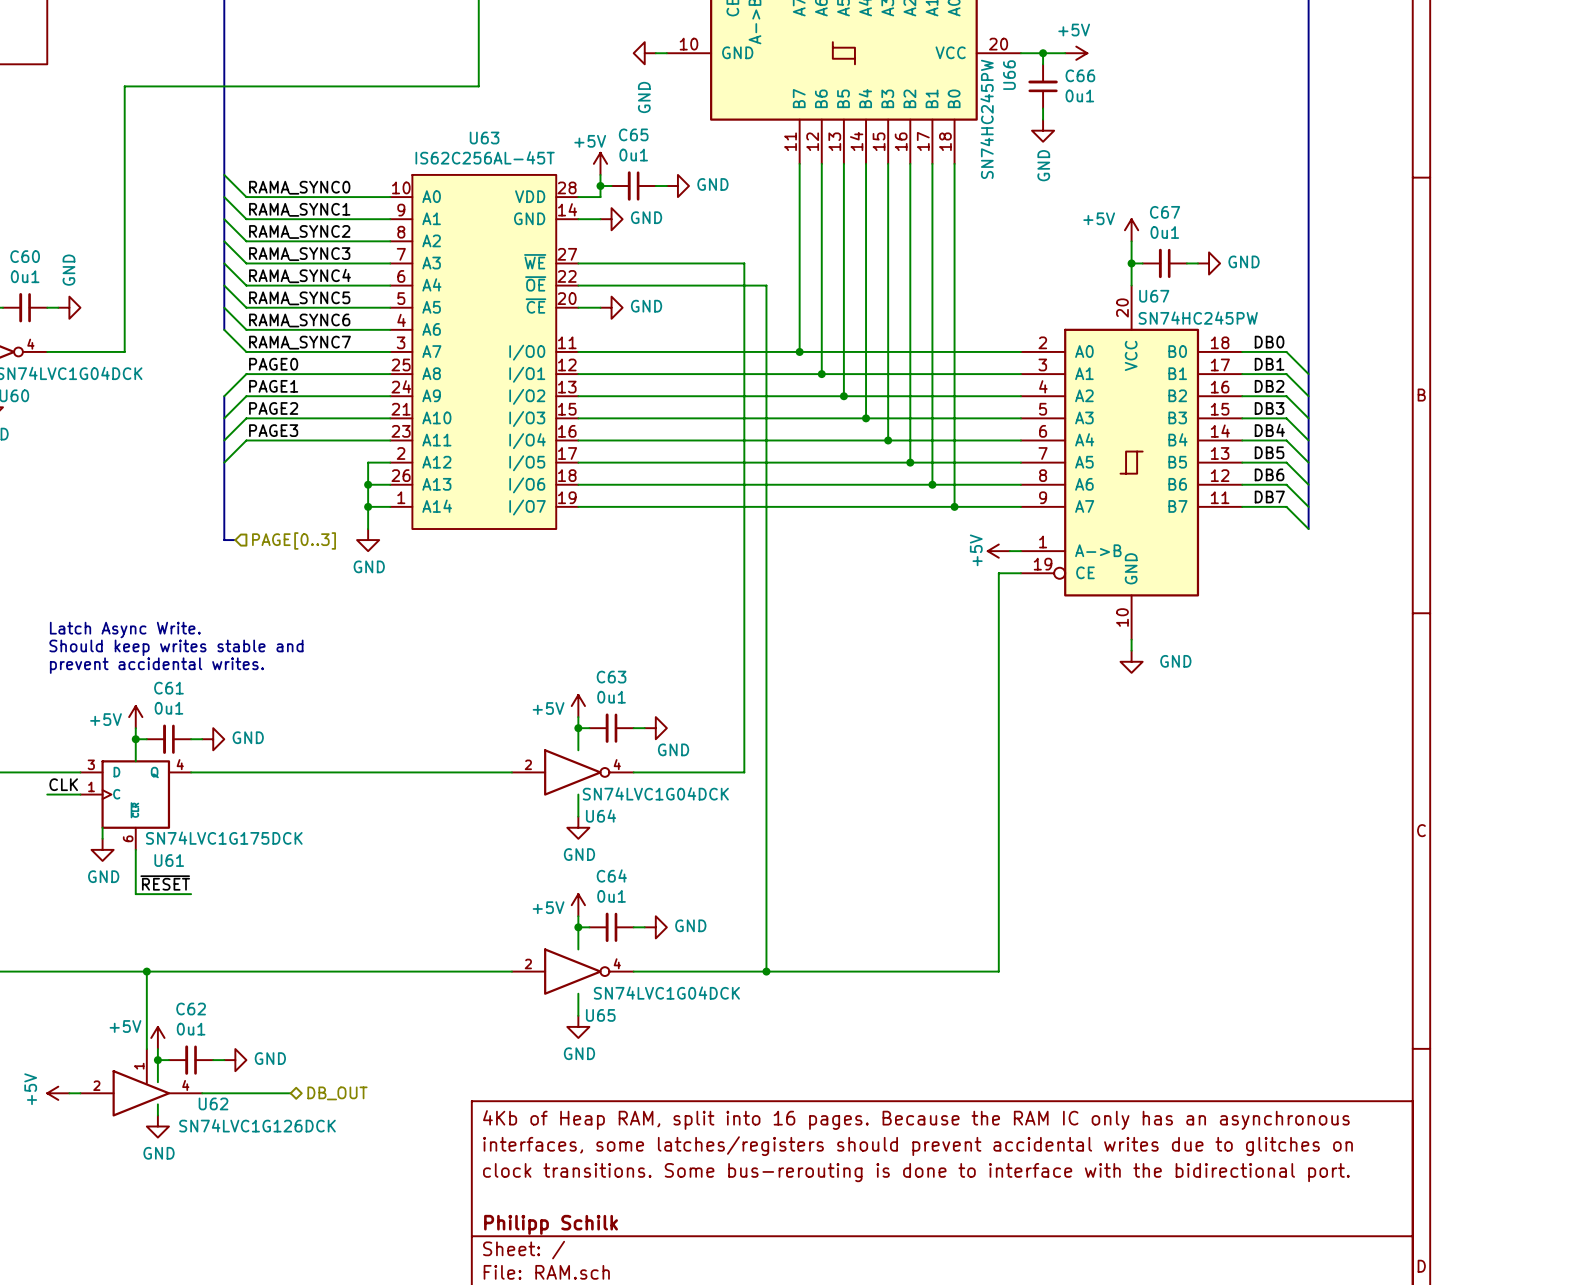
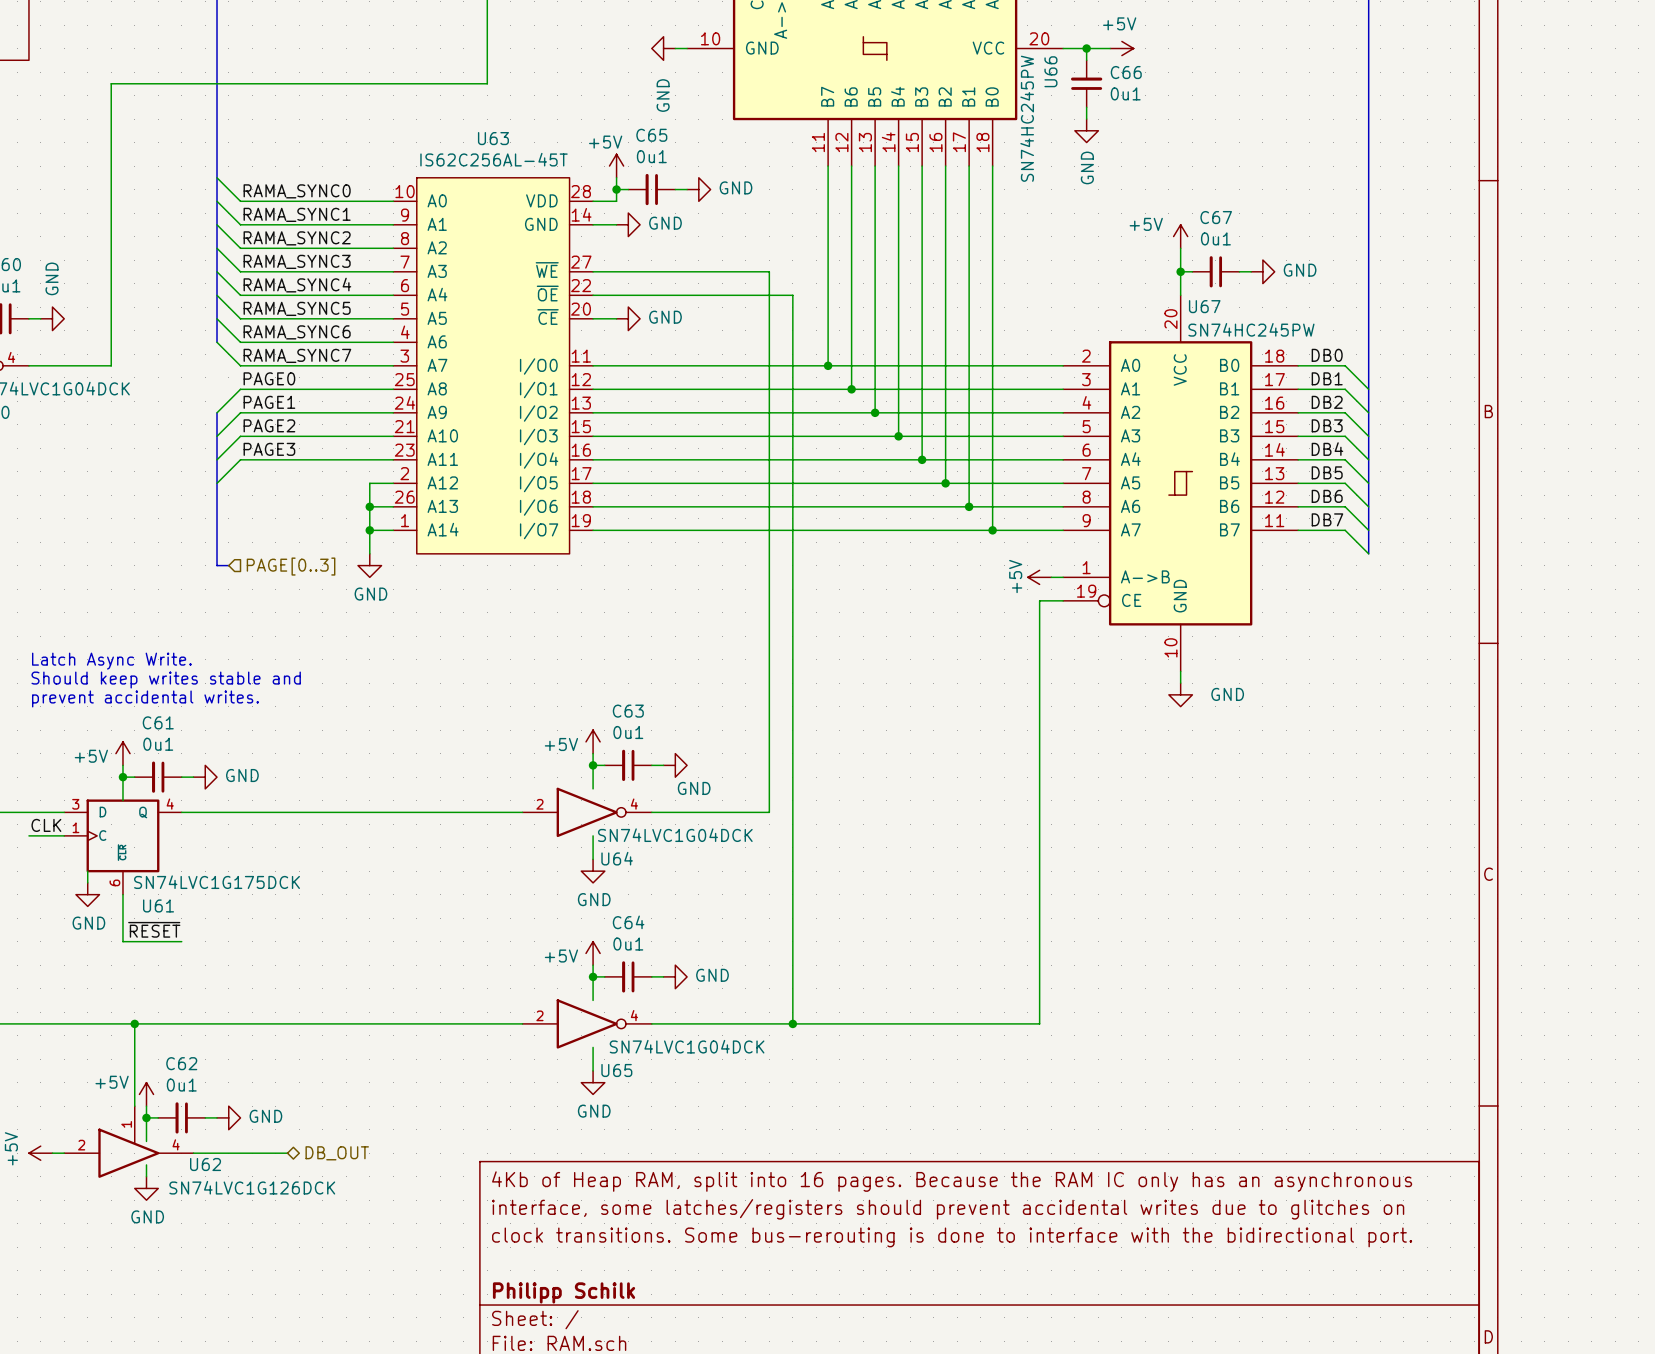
title block: interfaces, some latches/registers should prevent accidental writes due to glitches on (917, 1146) -> interface, some latches/registers should prevent accidental writes due to glitches on (948, 1209)

